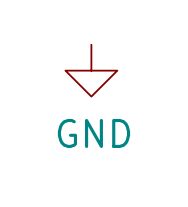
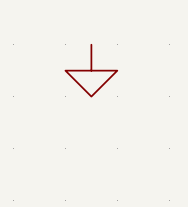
power symbol text: GND (93, 133) -> none

